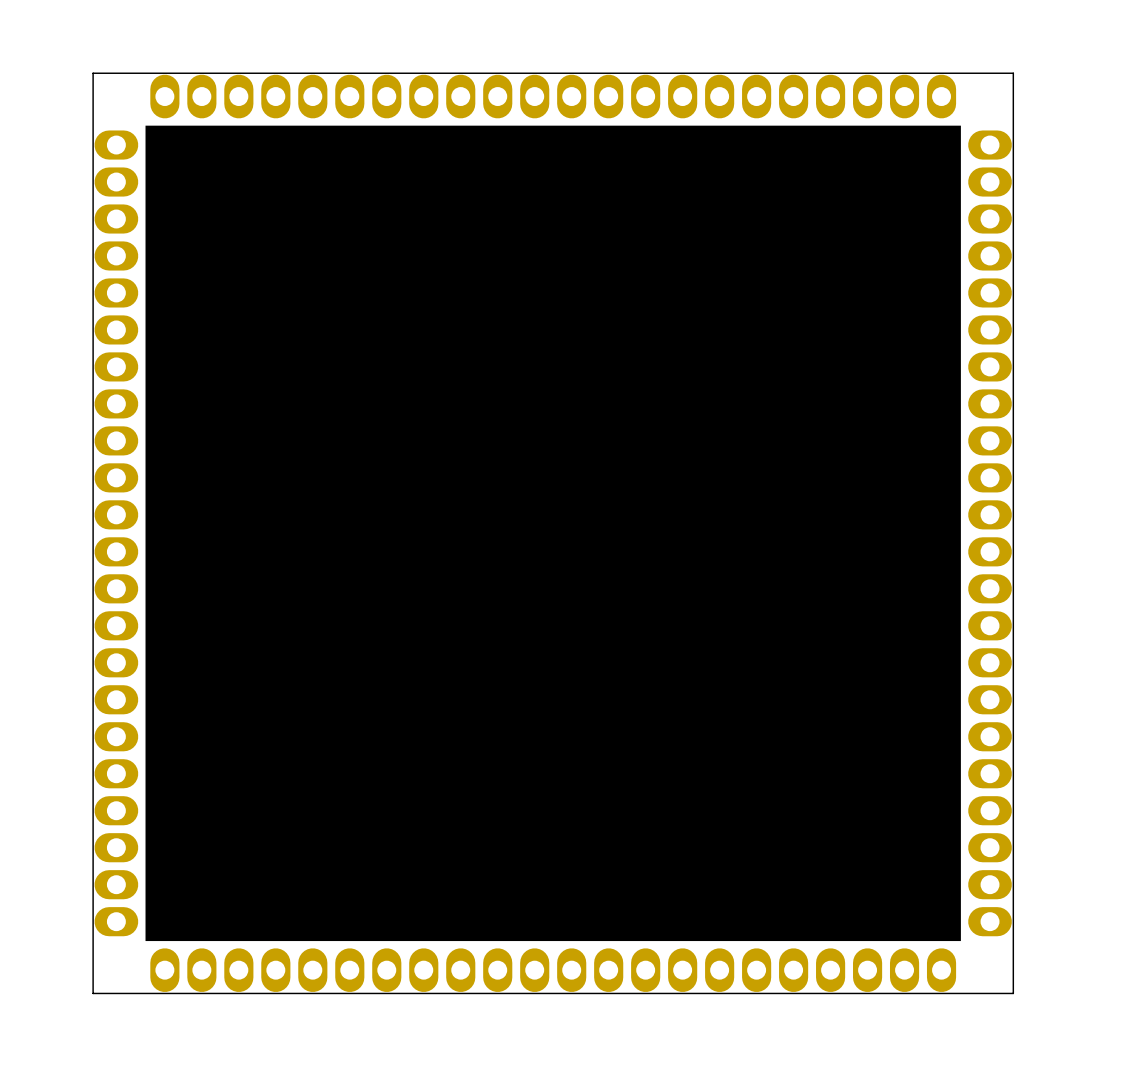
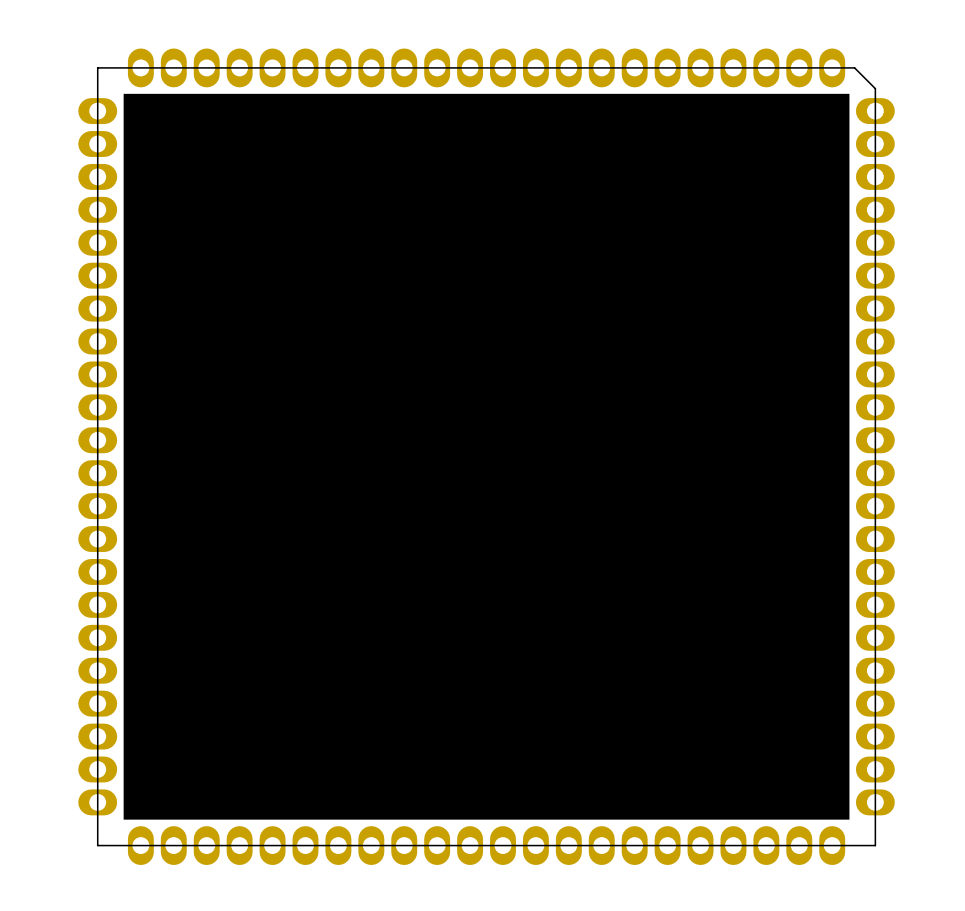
board edge: (1013, 73) (1013, 993) (93, 993) (93, 73) (1013, 73) -> (854, 67) (875, 88) (875, 845) (97, 845) (97, 67) (854, 67)

